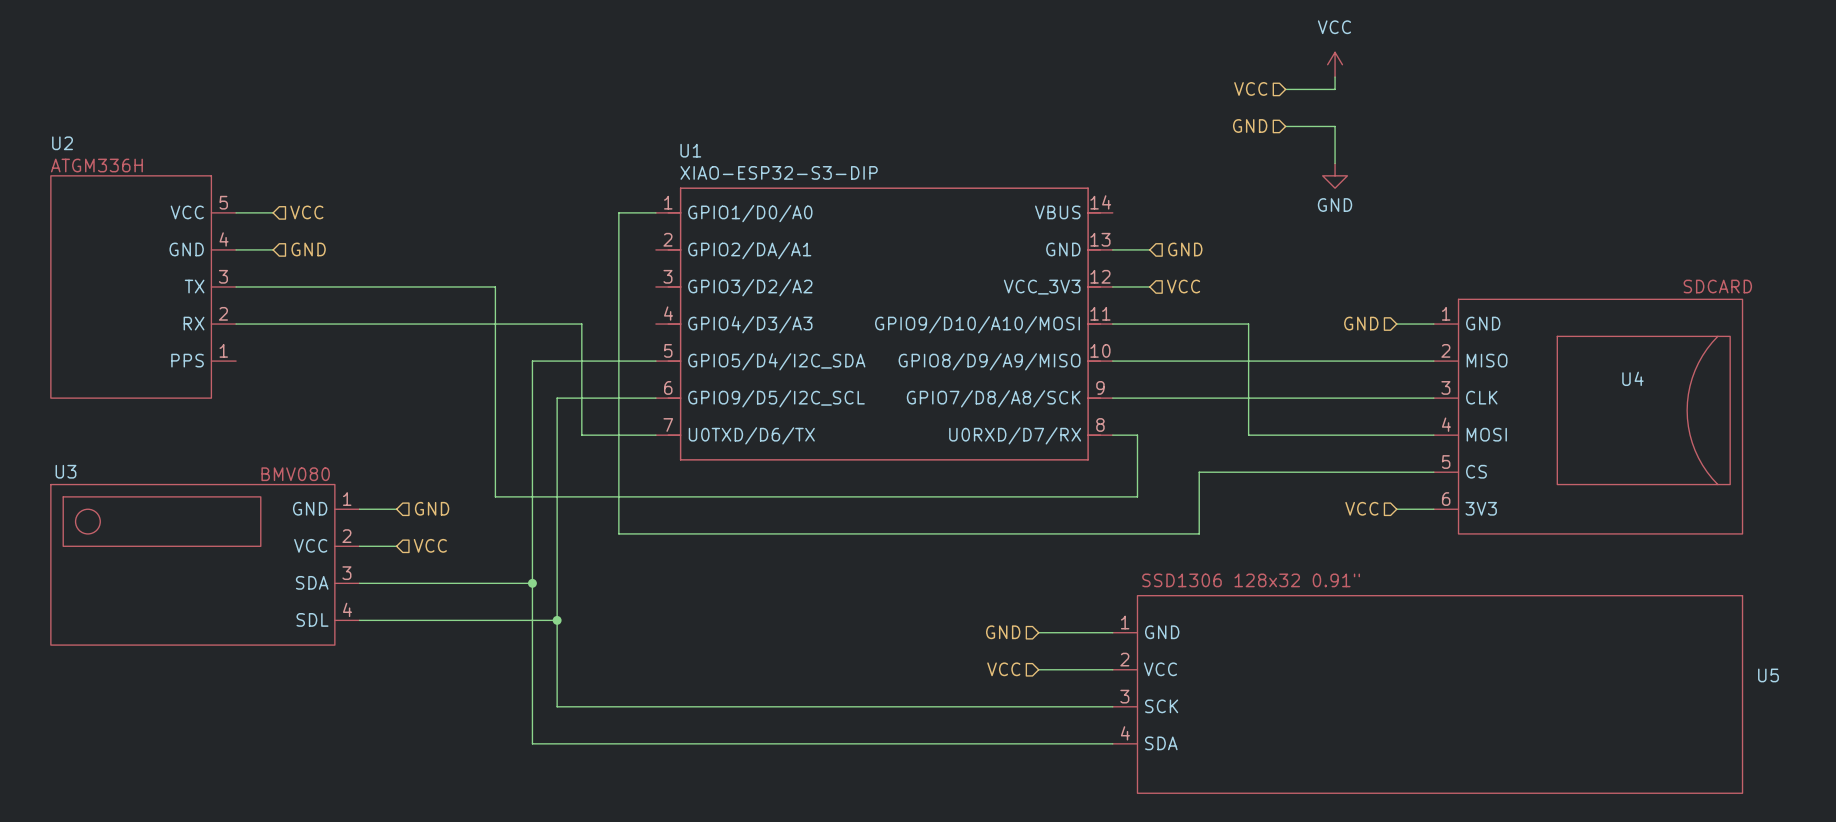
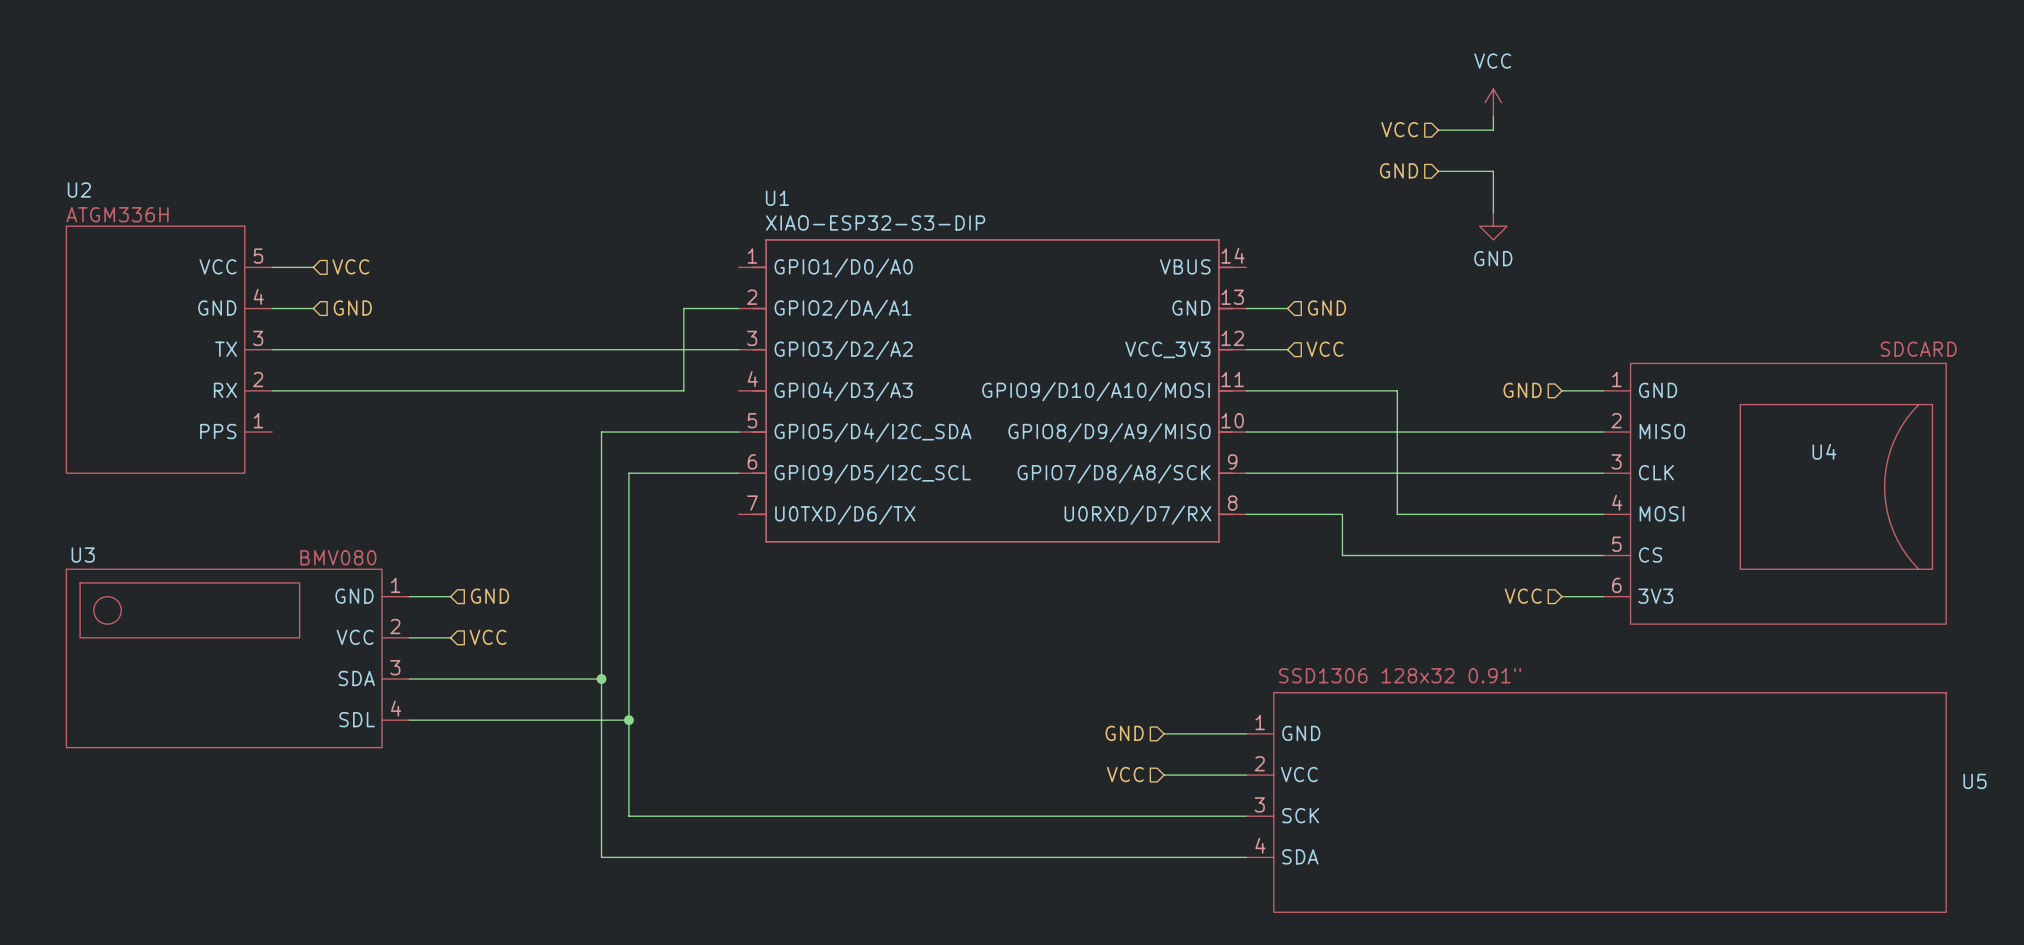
wire: (655, 212) (618, 212) (618, 533) (1199, 533) (1199, 472) -> (1273, 514) (1342, 514) (1342, 555)
wire: (495, 286) (495, 496) (1137, 496) (1137, 435) -> (560, 349) (738, 349)
wire: (581, 324) (581, 435) (655, 435) -> (656, 390) (683, 390) (683, 308) (738, 308)

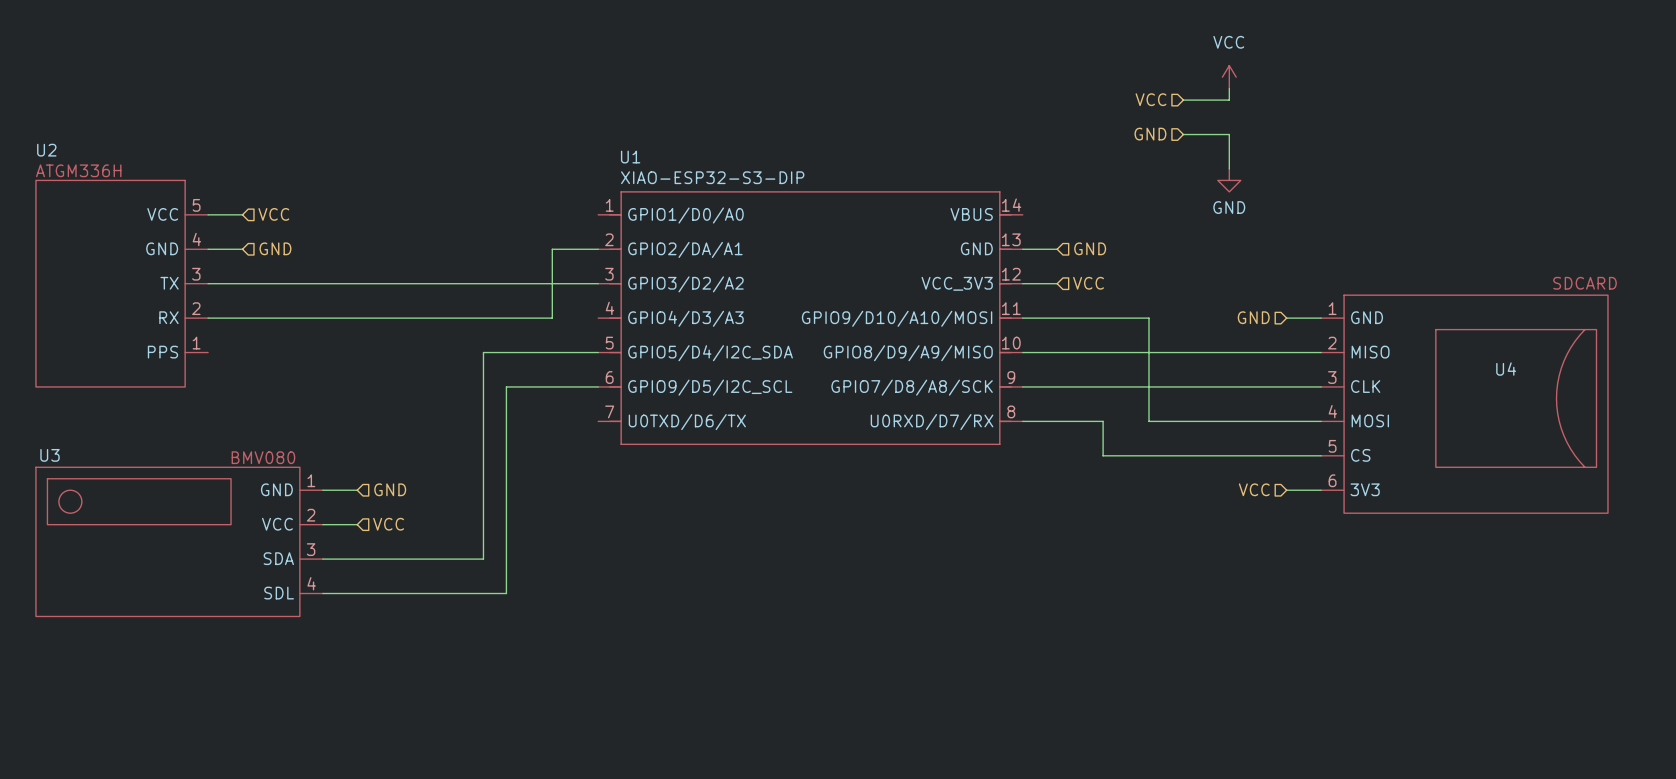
wire: (601, 679) (601, 857) (1246, 857) -> none
junction: (601, 679) -> none
wire: (628, 720) (628, 816) (1246, 816) -> none
junction: (628, 720) -> none
hierarchical label: GND (1124, 733) -> none
wire: (1164, 733) (1246, 733) -> none
hierarchical label: VCC (1125, 774) -> none
wire: (1164, 775) (1246, 775) -> none
U5: (1596, 802) -> none

